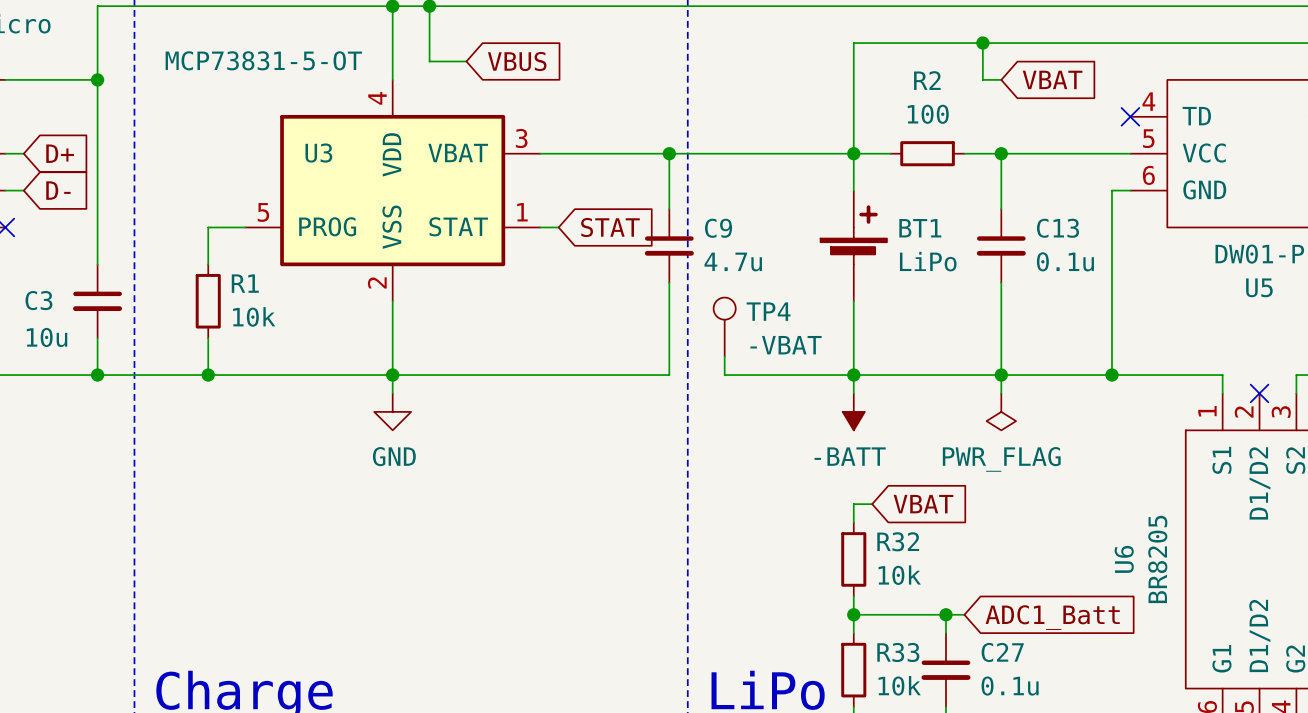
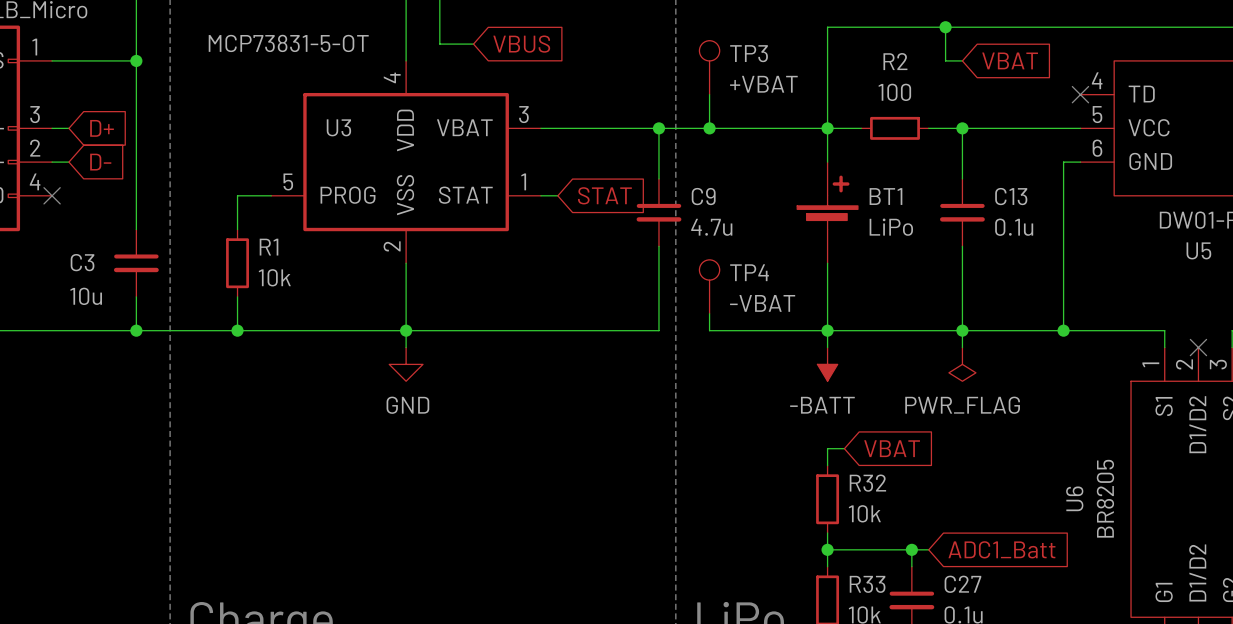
TP3: none -> +VBAT (709, 67)
wire: none -> (709, 94) (709, 128)
junction: none -> (709, 128)

